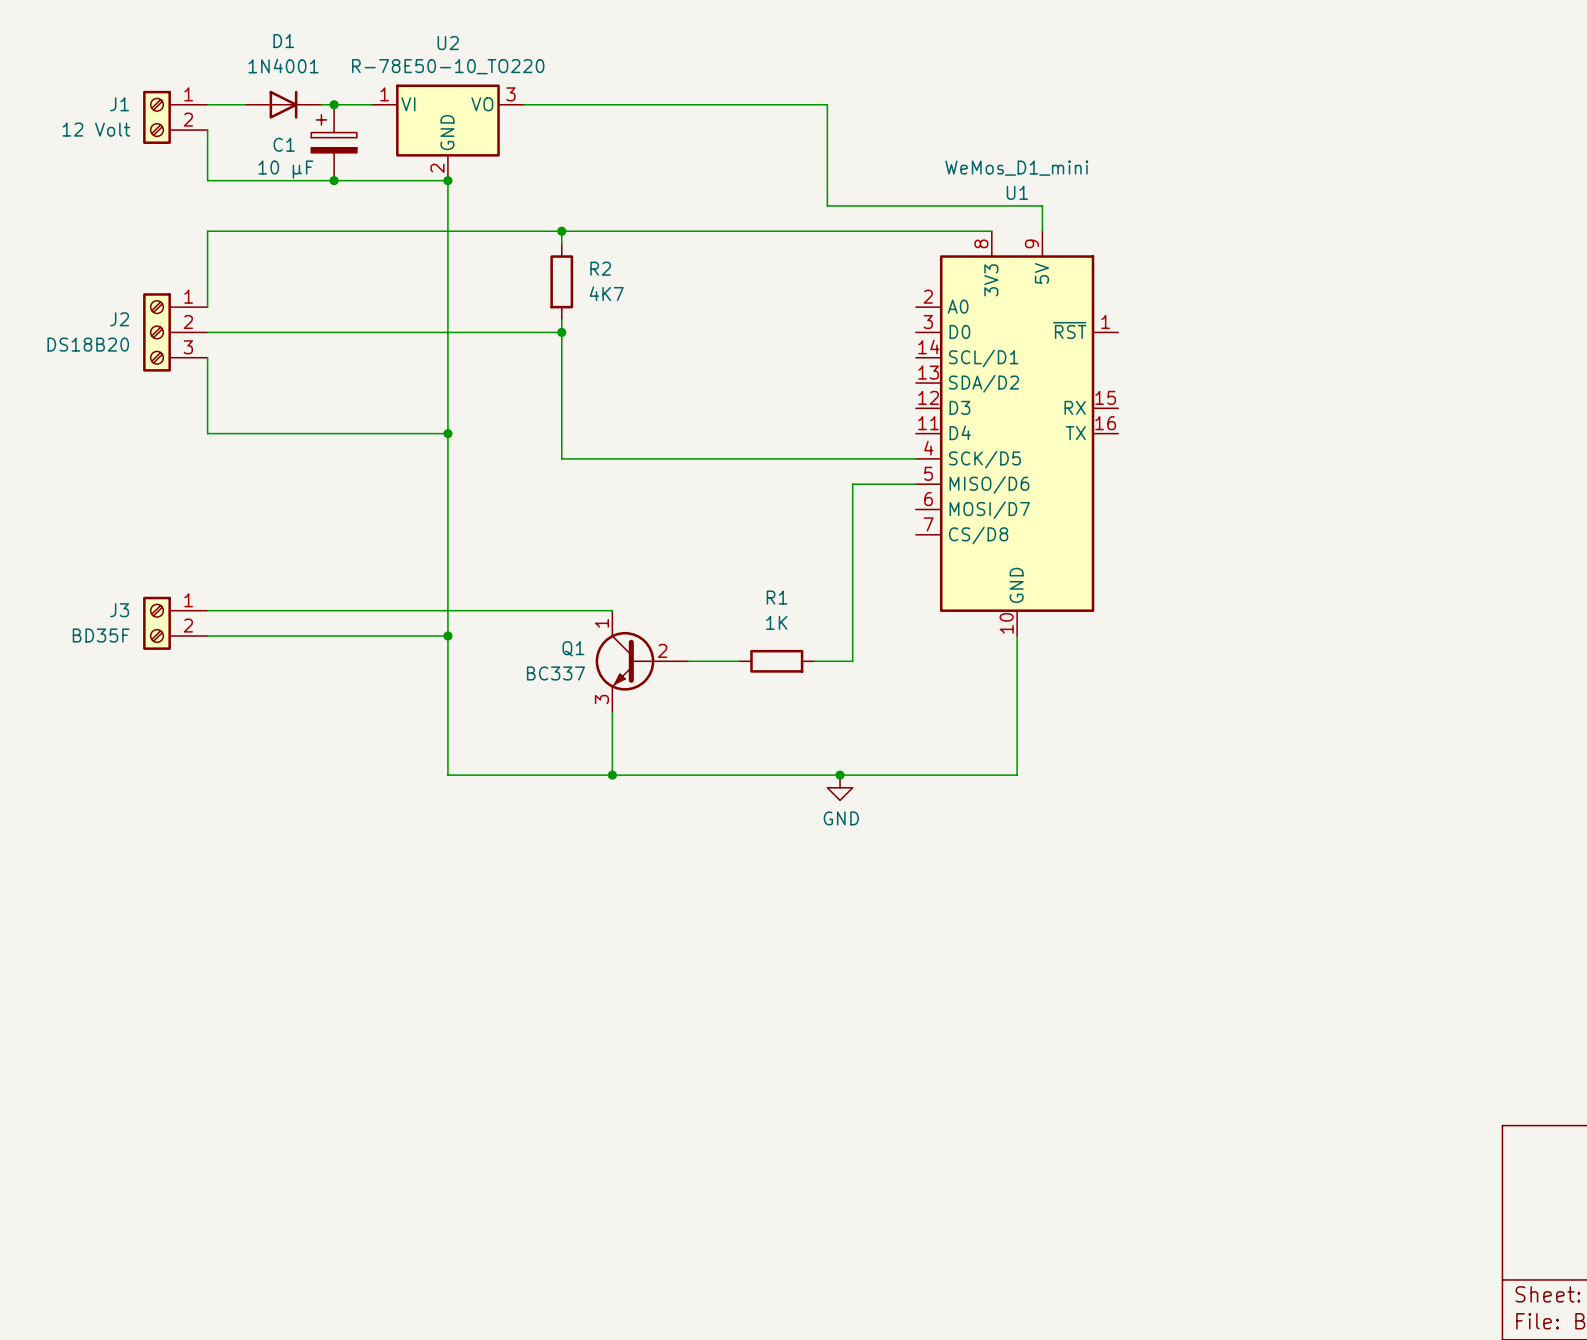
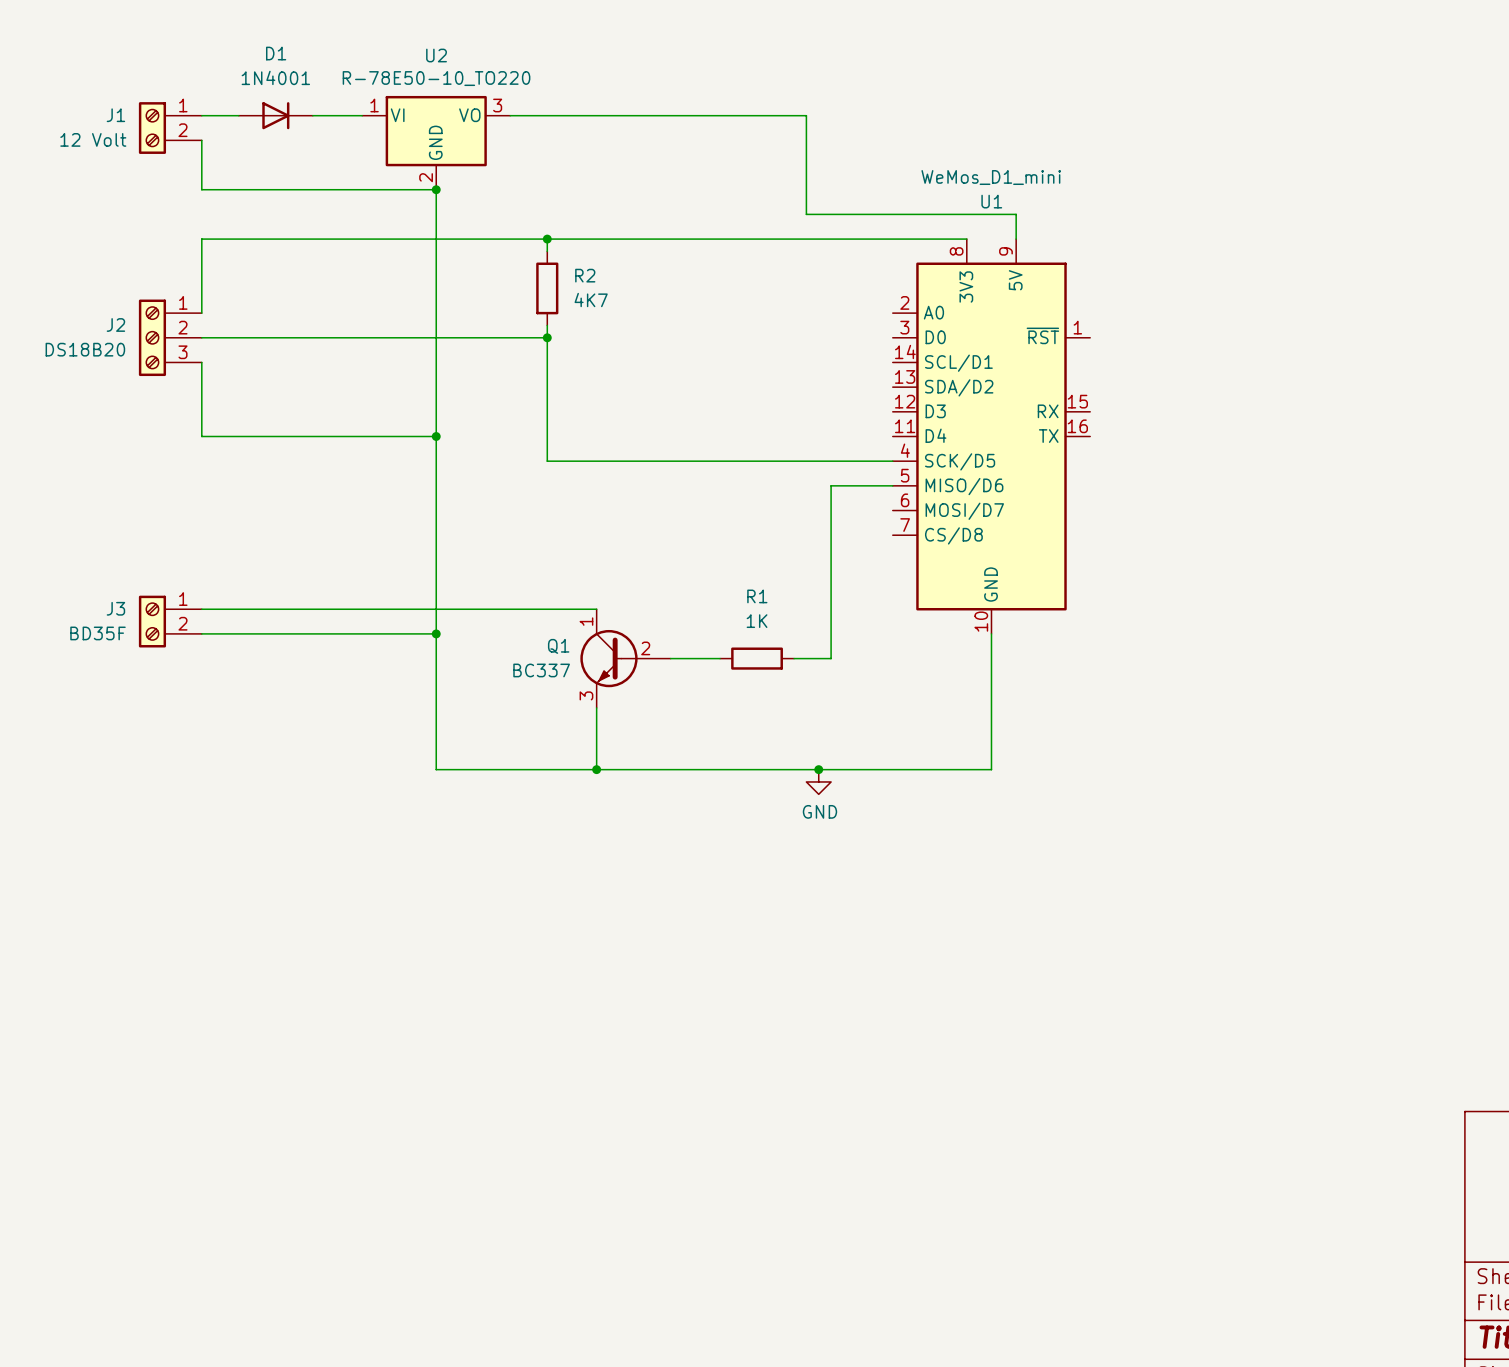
junction: (334, 104) -> none
C1: 10 µF (334, 142) -> none
junction: (334, 180) -> none

